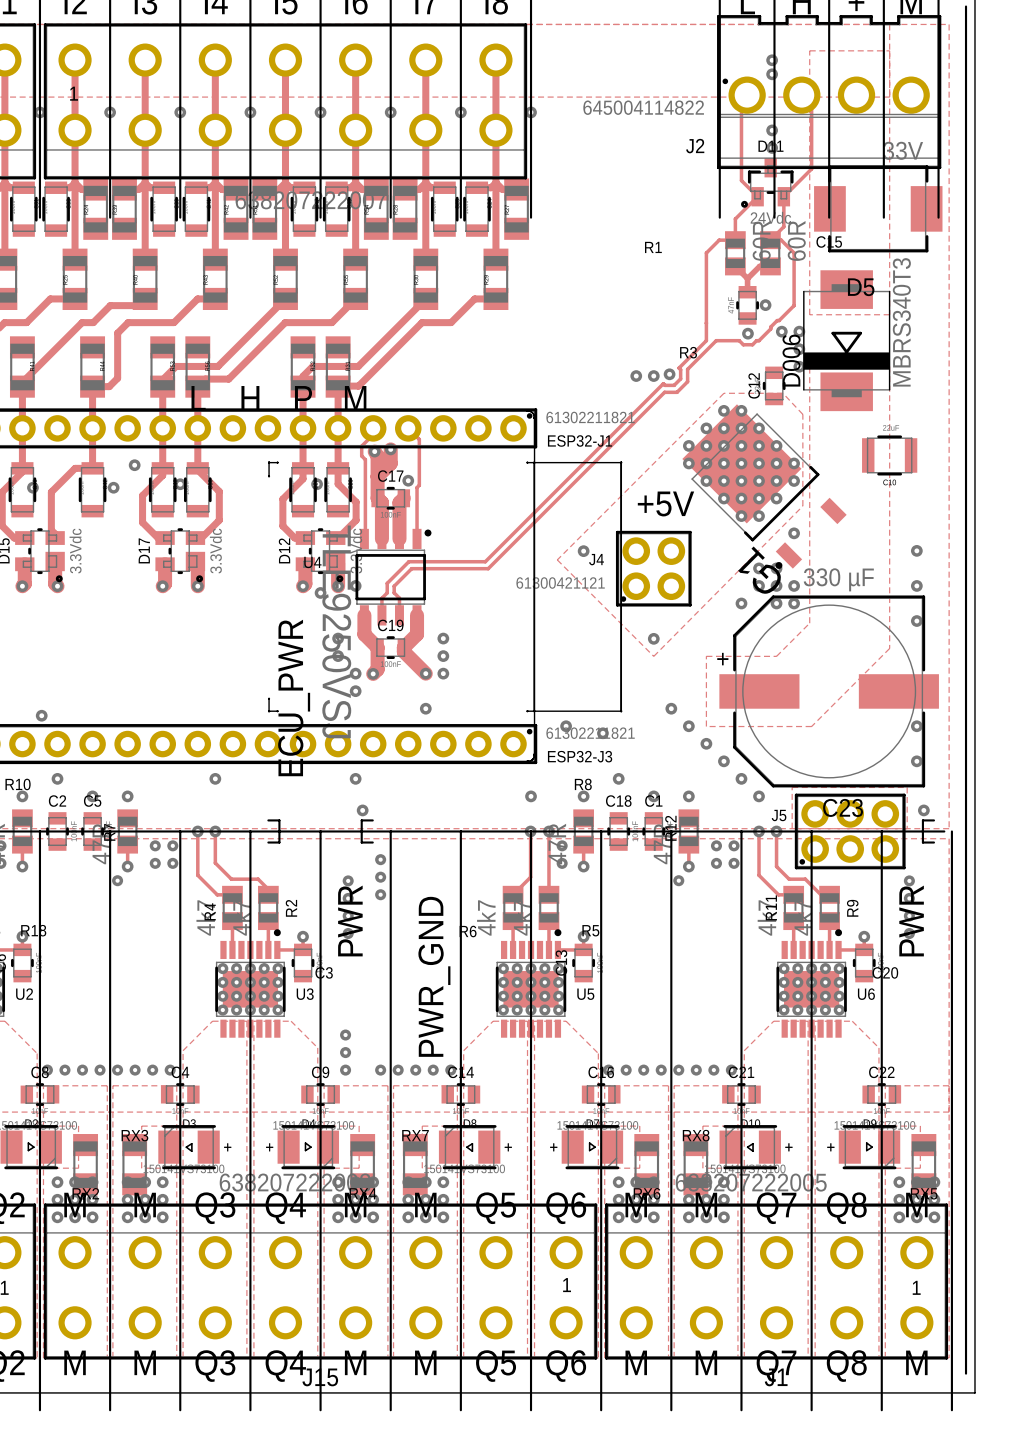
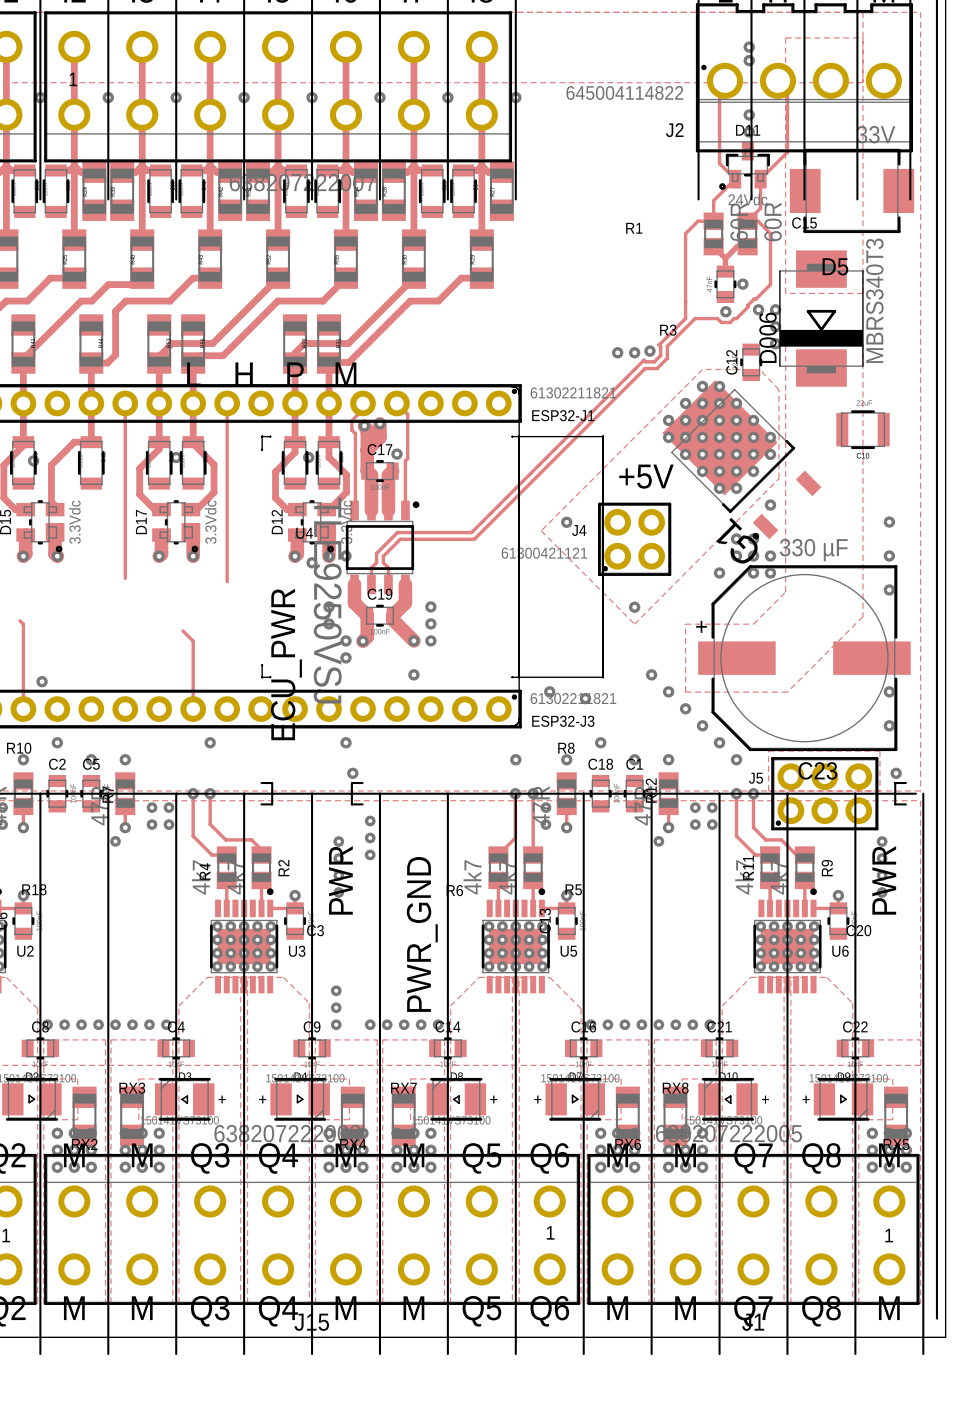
track: none -> (125, 403) (125, 578)
track: none -> (227, 403) (227, 581)
via: (134, 465) -> none
via: (113, 487) -> none
track: none -> (20, 620) (23, 624) (23, 709)
track: none -> (183, 630) (193, 641) (193, 709)

